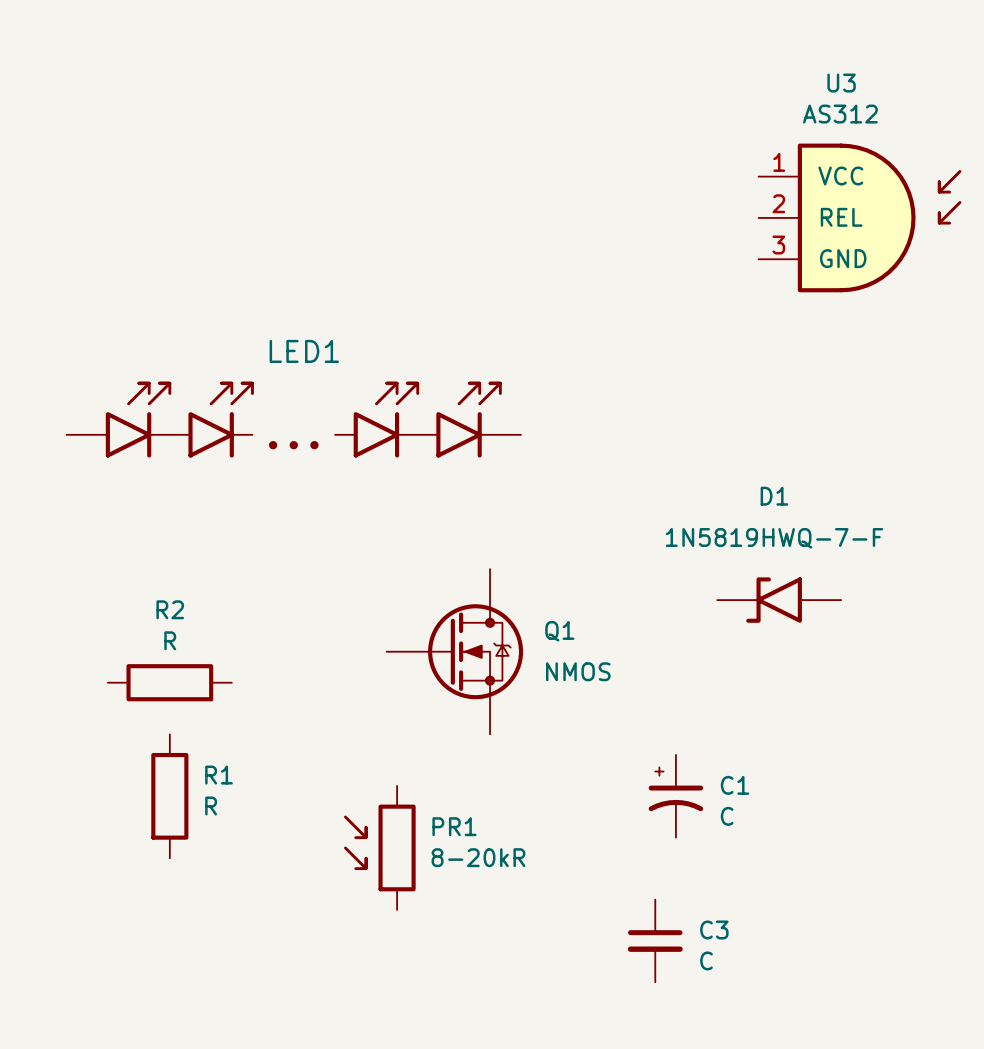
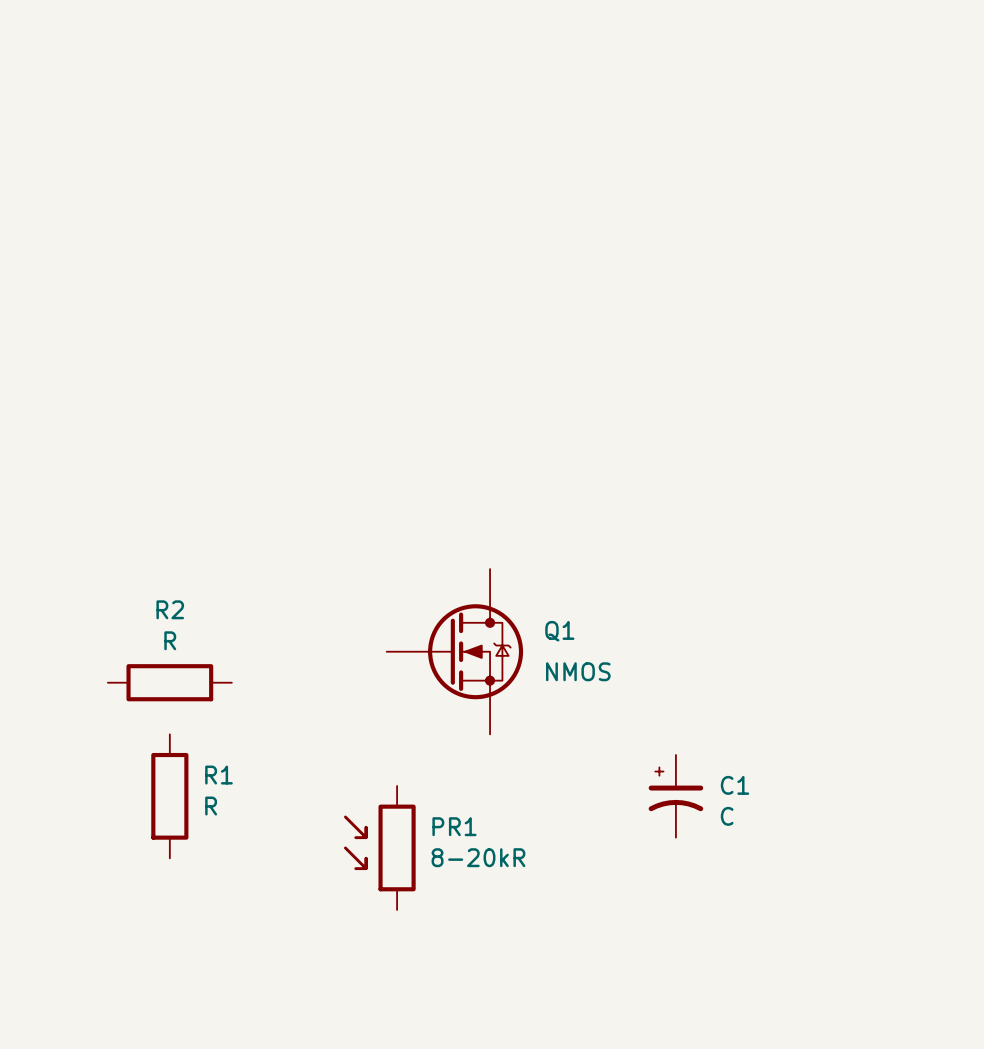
U3: AS312 (859, 217) -> none
LED1: (293, 419) -> none
D1: 1N5819HWQ-7-F (779, 600) -> none
C3: C (655, 940) -> none

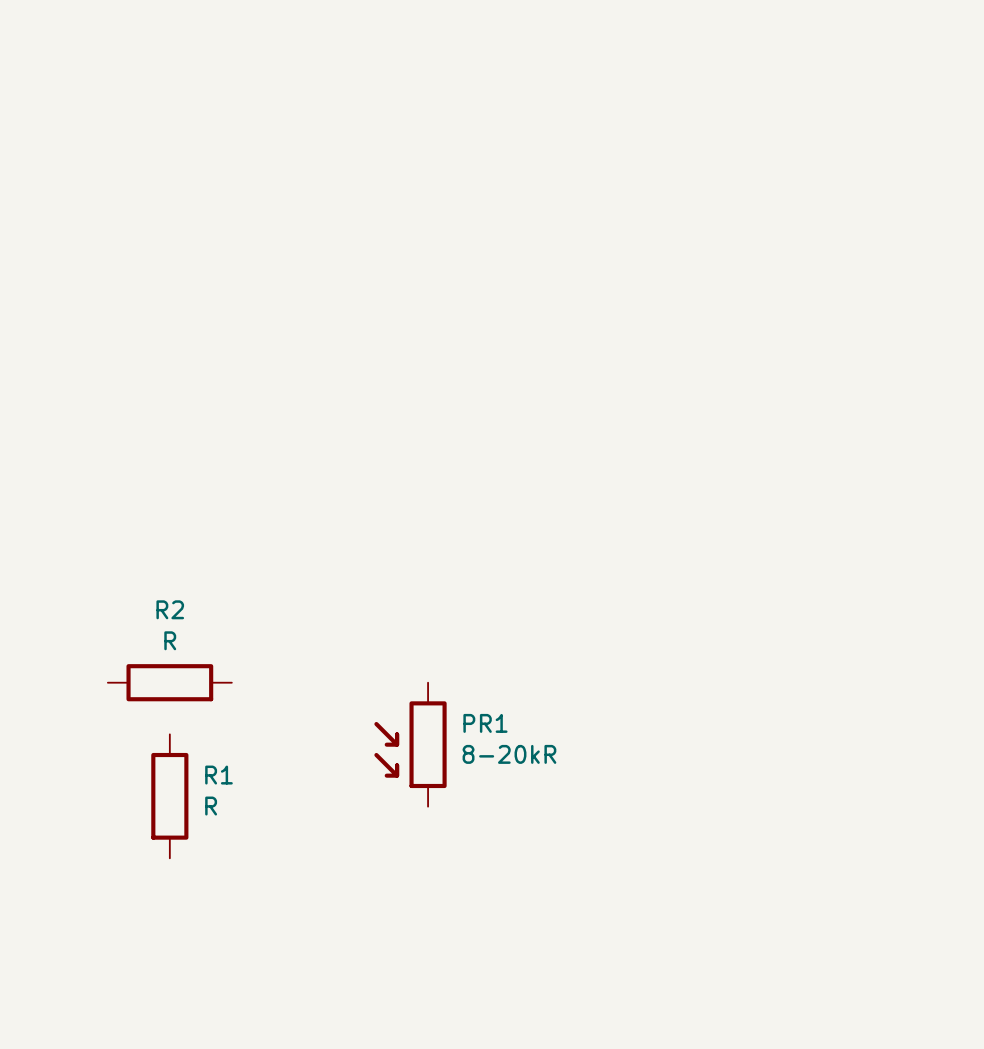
Q1: NMOS (454, 651) -> none
PR1 symbol: [343, 785, 416, 910] -> [374, 682, 447, 807]
C1: C (675, 796) -> none

